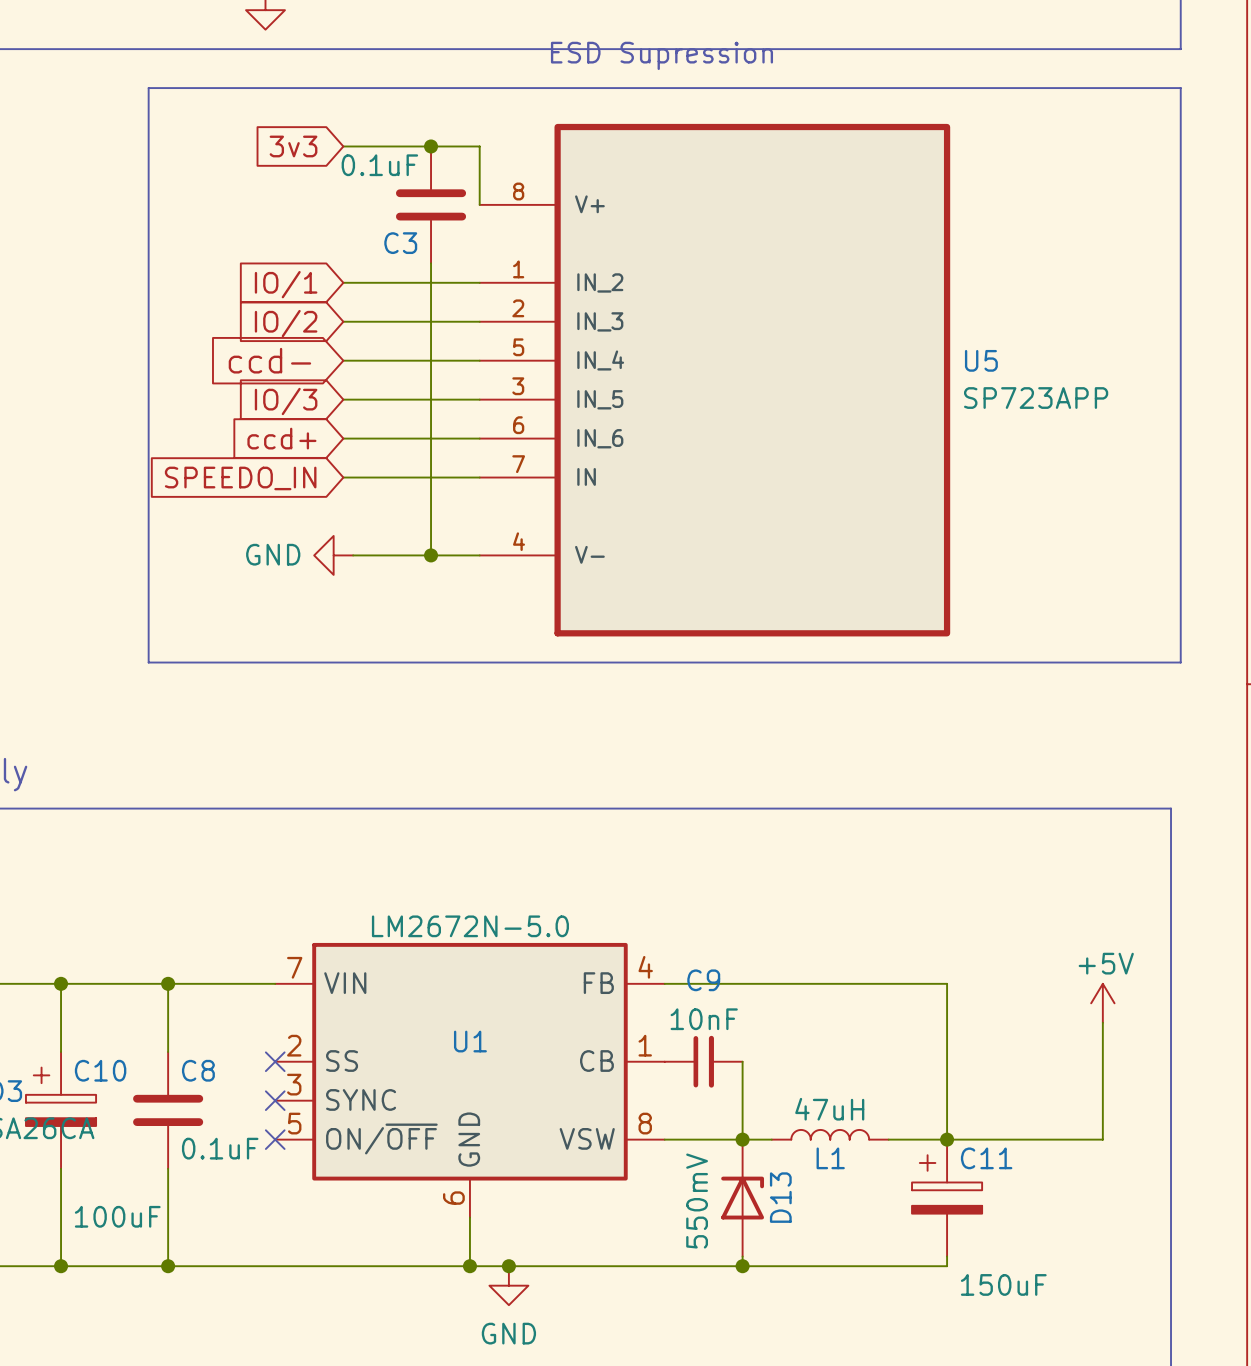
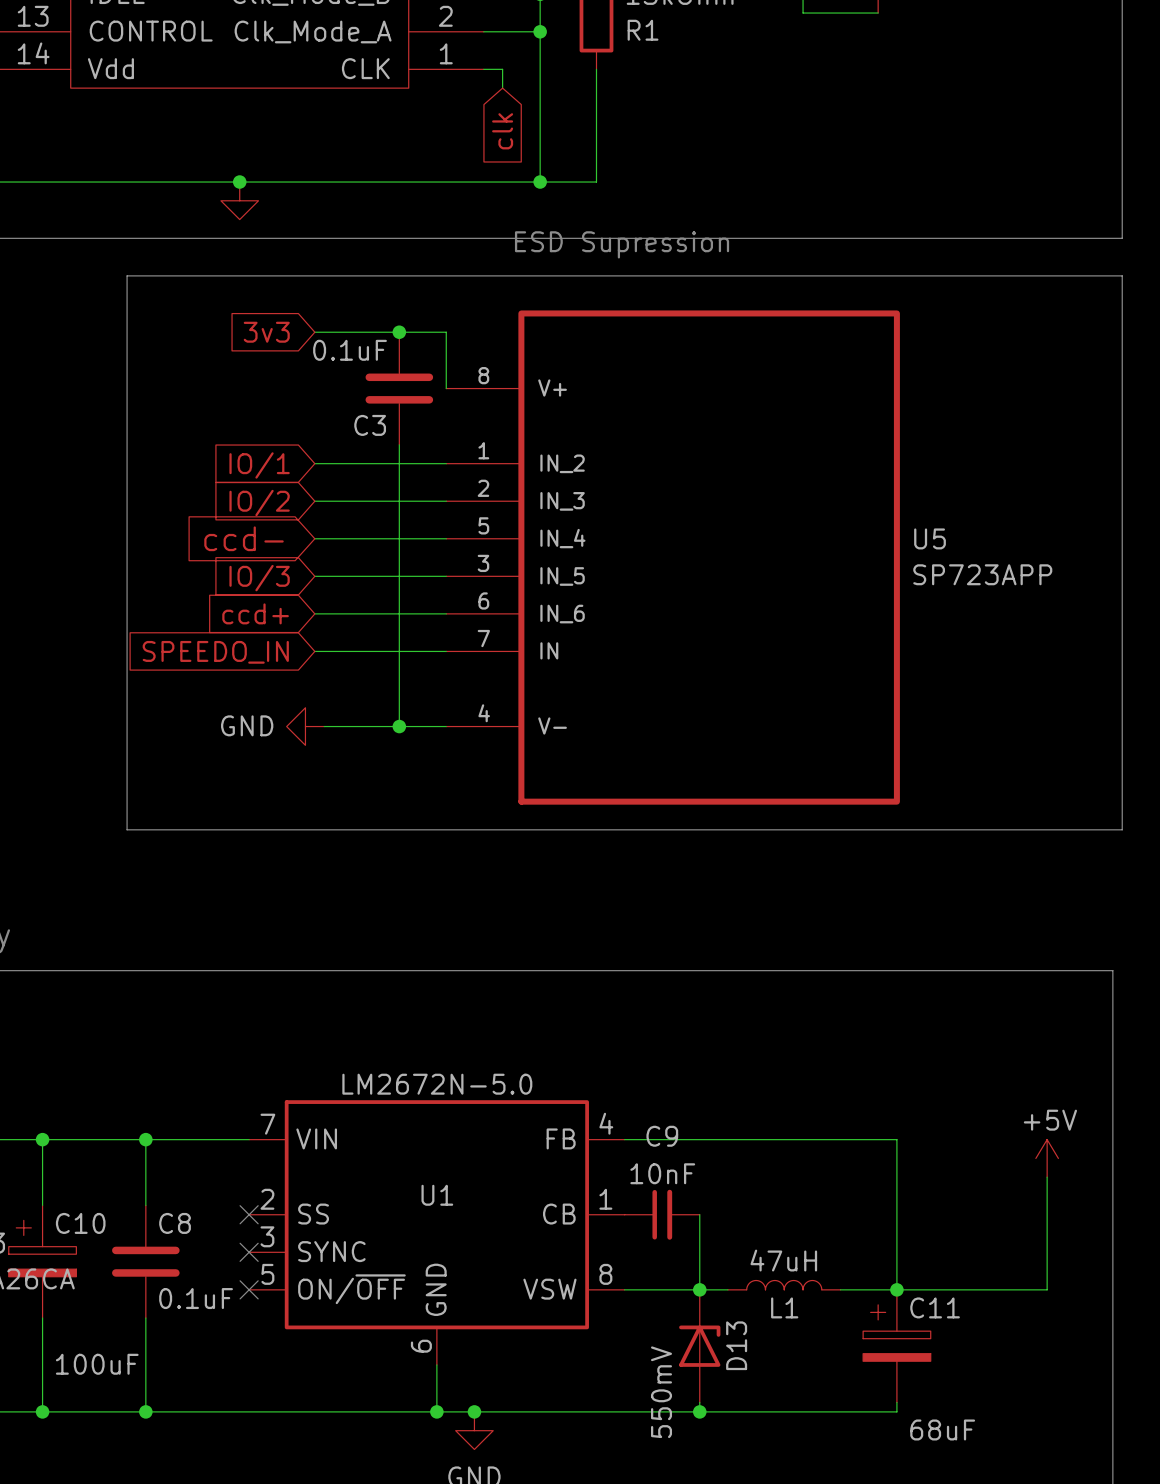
D13 value position: 550mV (697, 1201) -> 550mV (661, 1392)
C11 value: 150uF (1003, 1284) -> 68uF (942, 1429)

